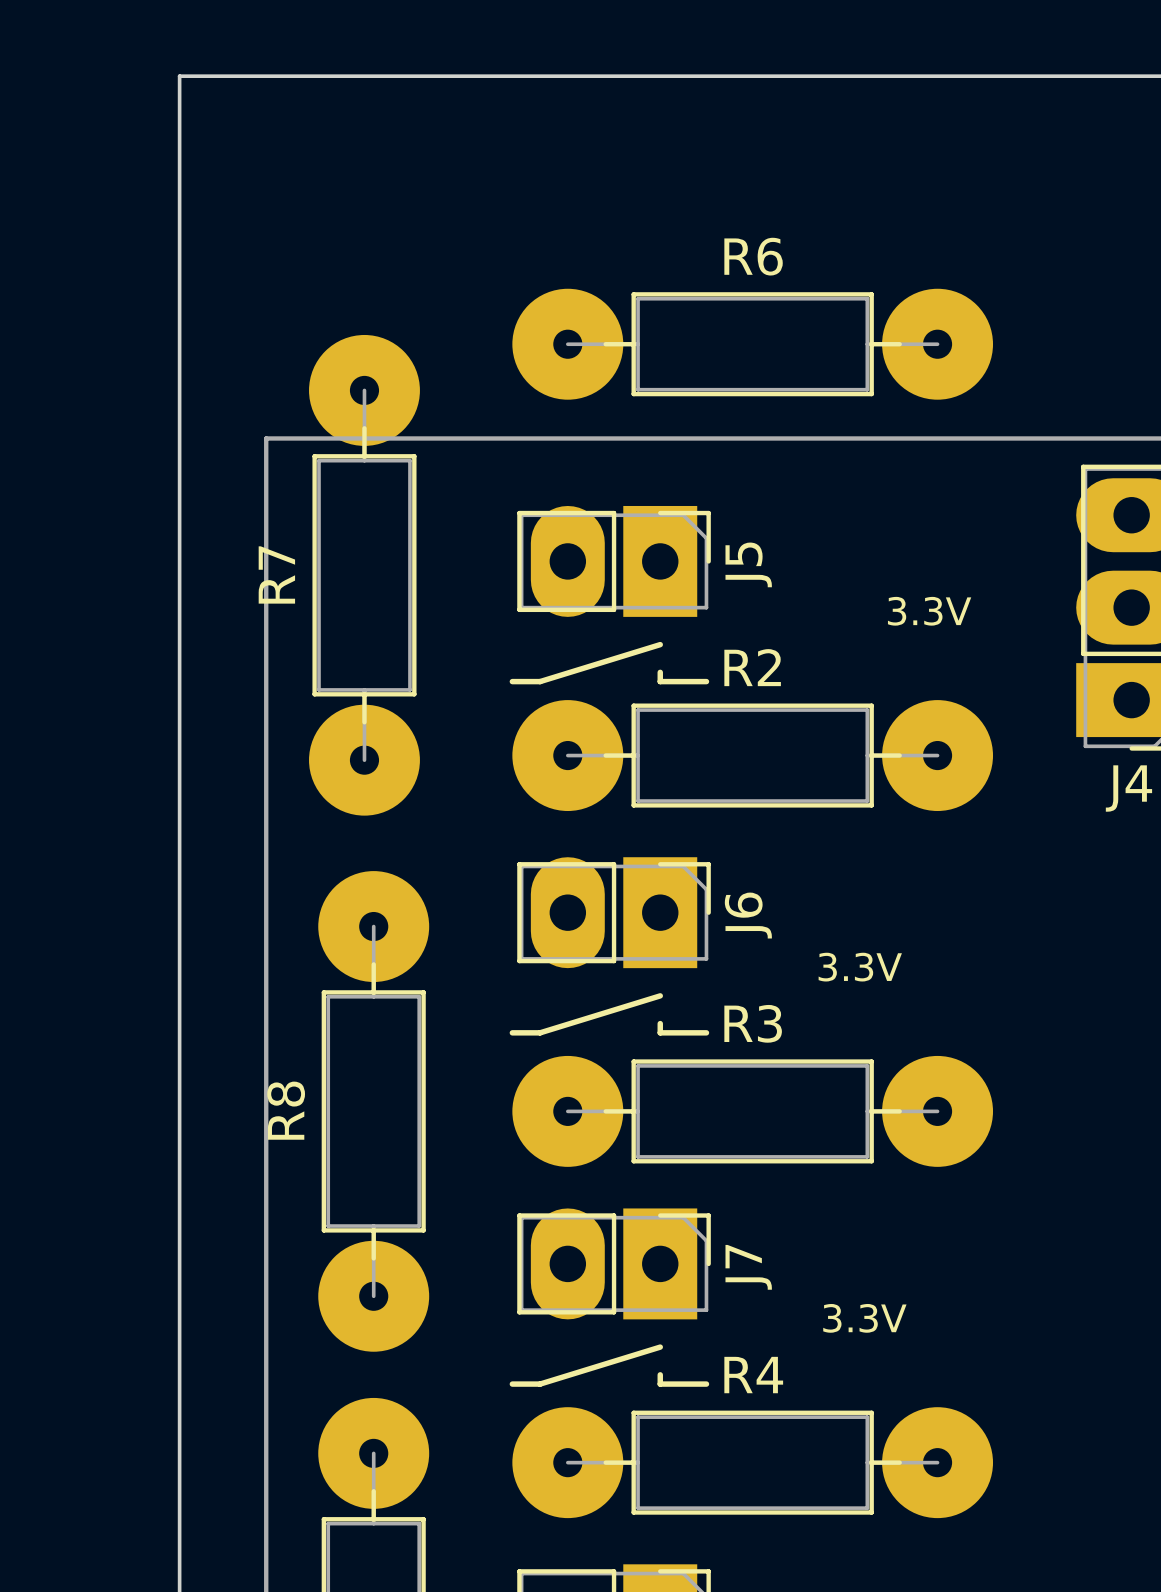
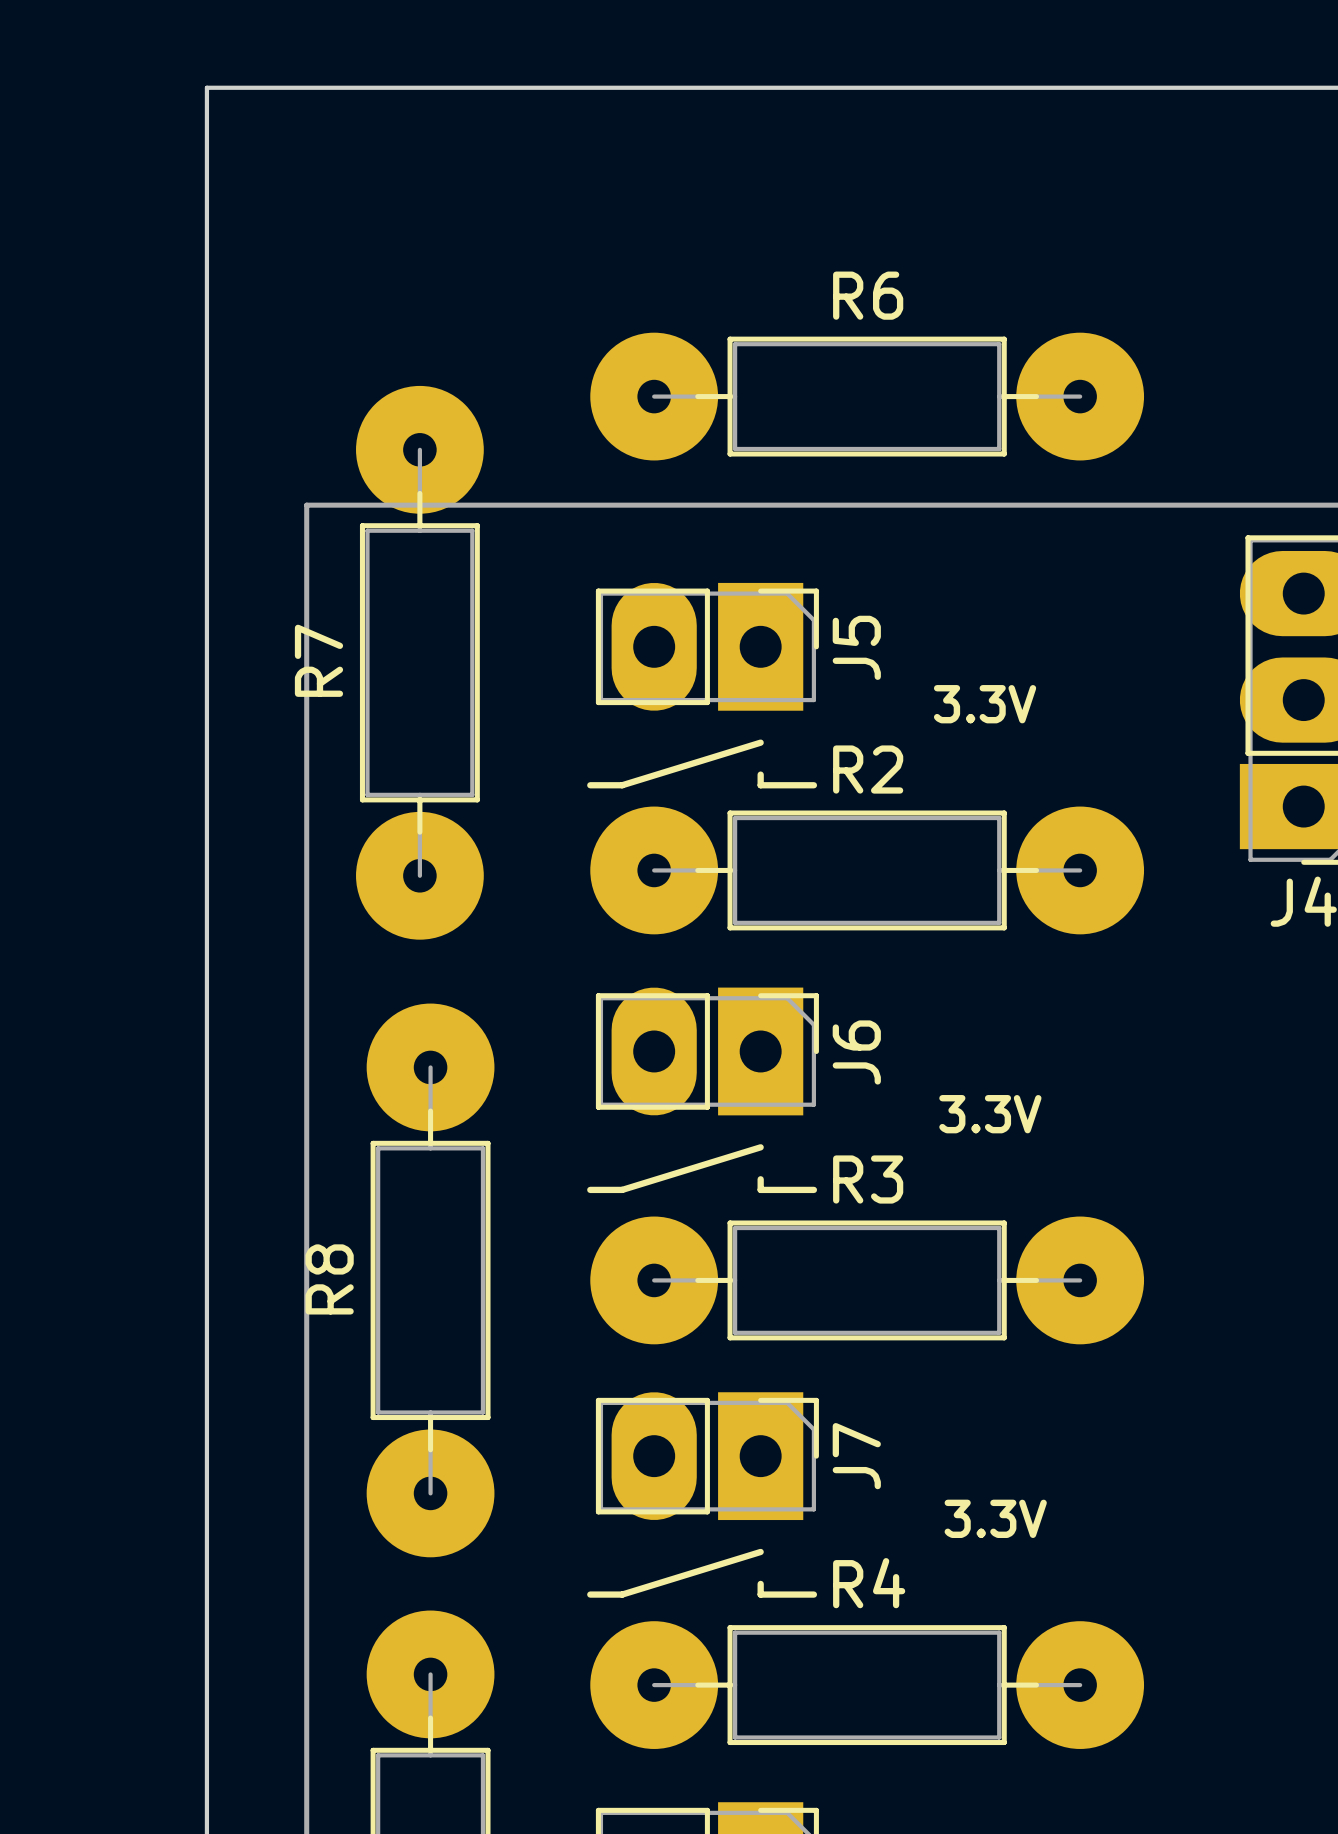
text position: 3.3V (929, 611) -> 3.3V (985, 704)

